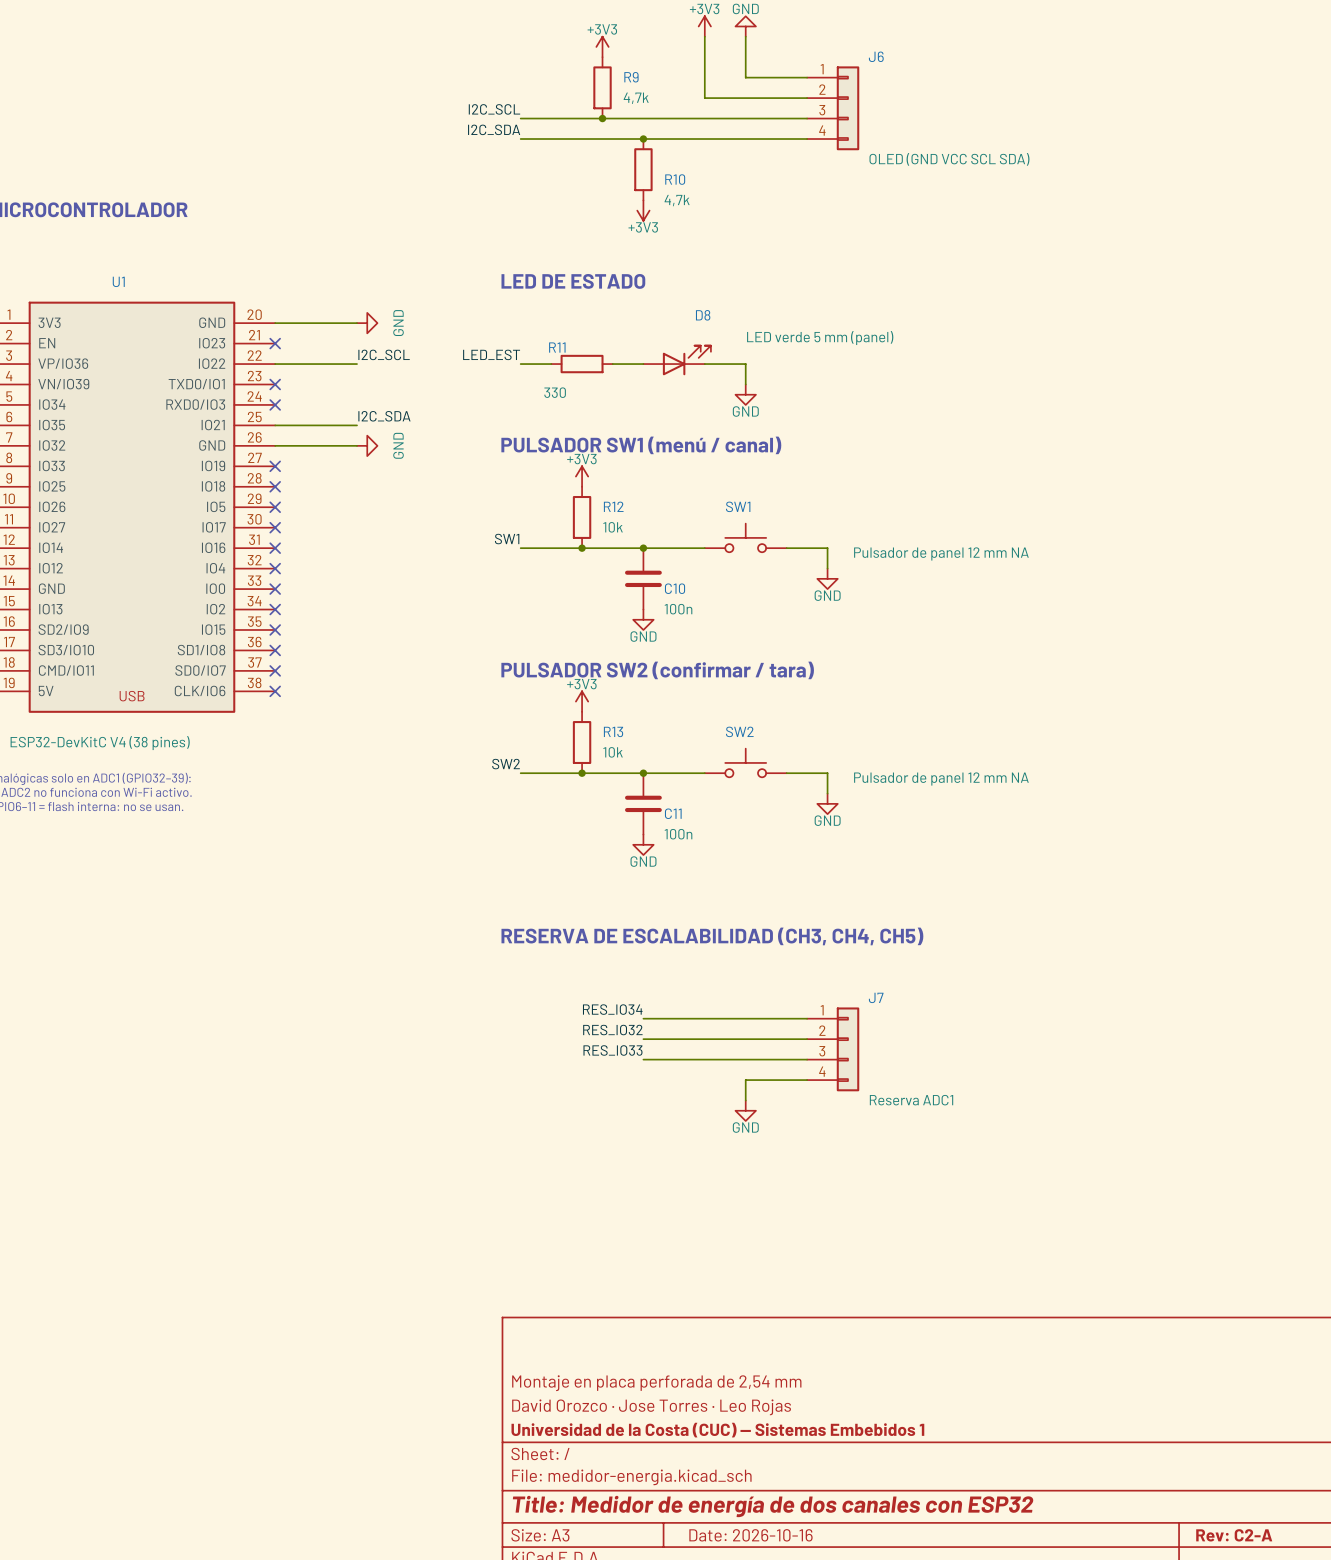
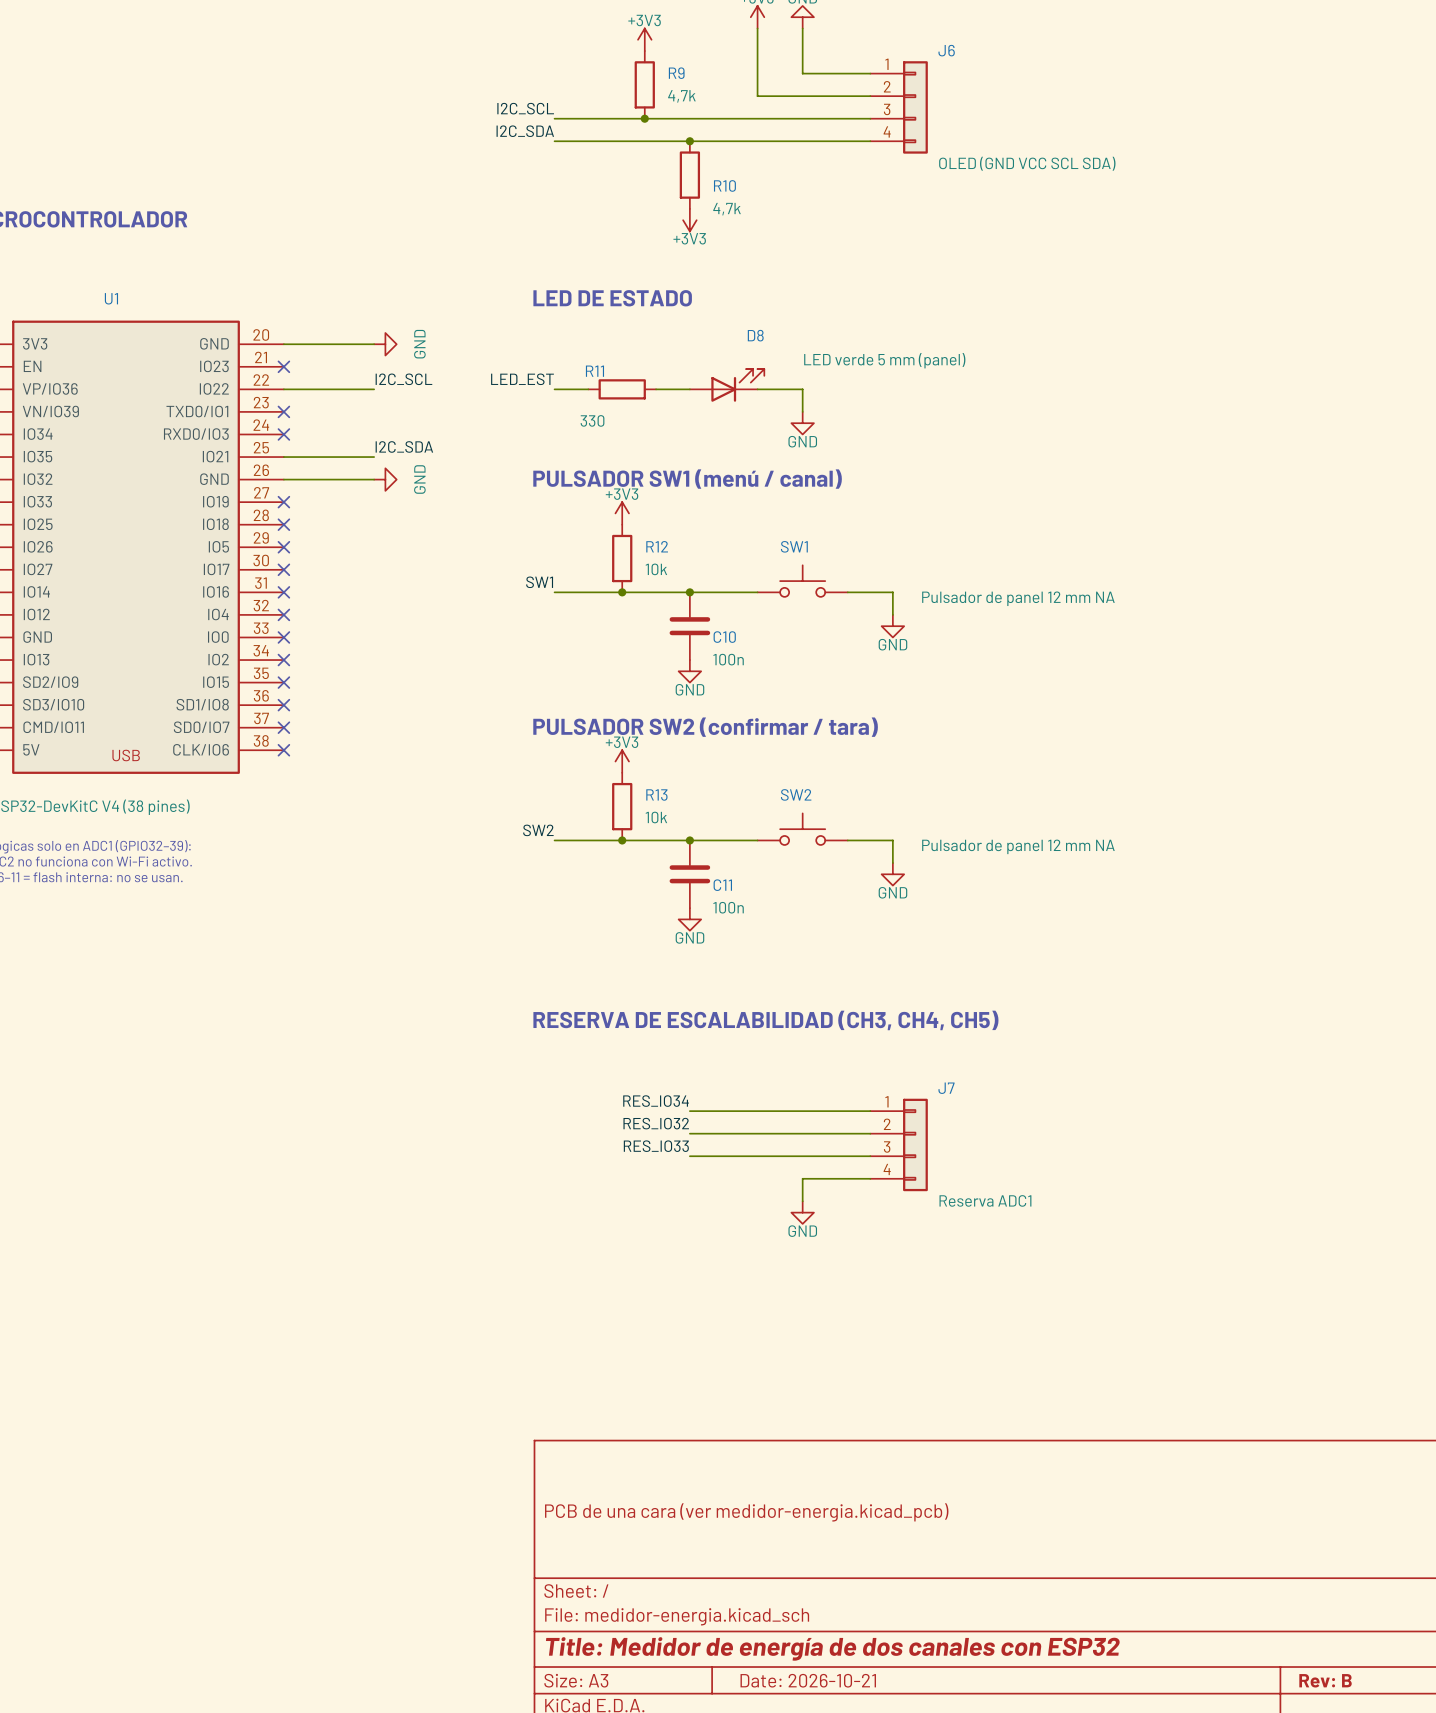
title block: Montaje en placa perforada de 2,54 mm (656, 1383) -> PCB de una cara (ver medidor-energia.kicad_pcb) (746, 1512)
title block: David Orozco · Jose Torres · Leo Rojas (651, 1407) -> none
title block: Universidad de la Costa (CUC) — Sistemas Embebidos 1 (717, 1430) -> none
title block: Date: 2026-10-16 (750, 1535) -> Date: 2026-10-21 (808, 1680)
title block: Rev: C2-A (1234, 1535) -> Rev: B (1325, 1680)

